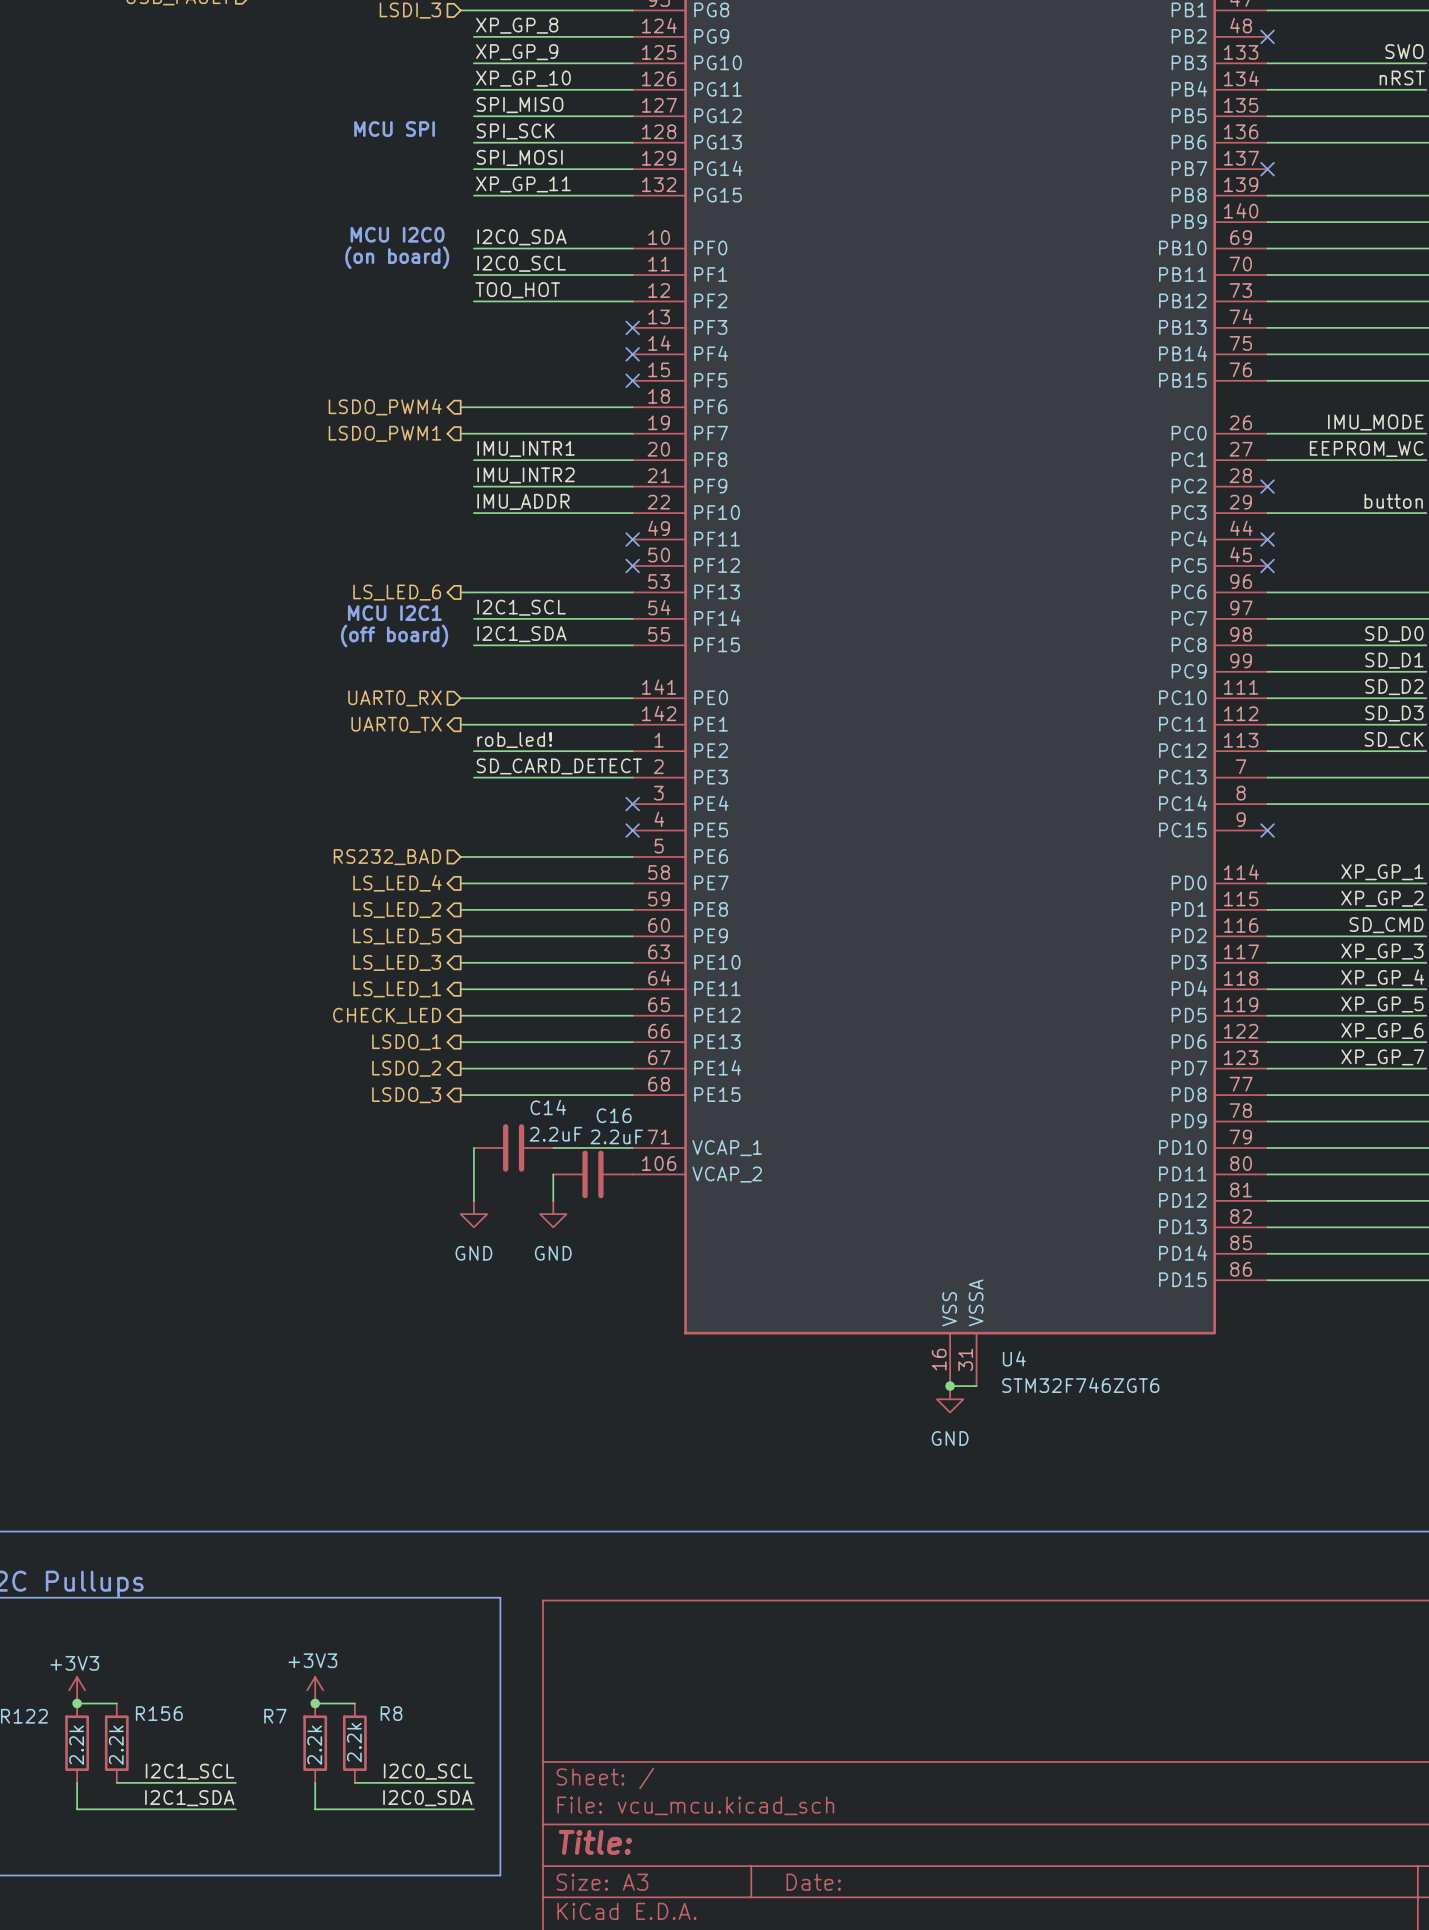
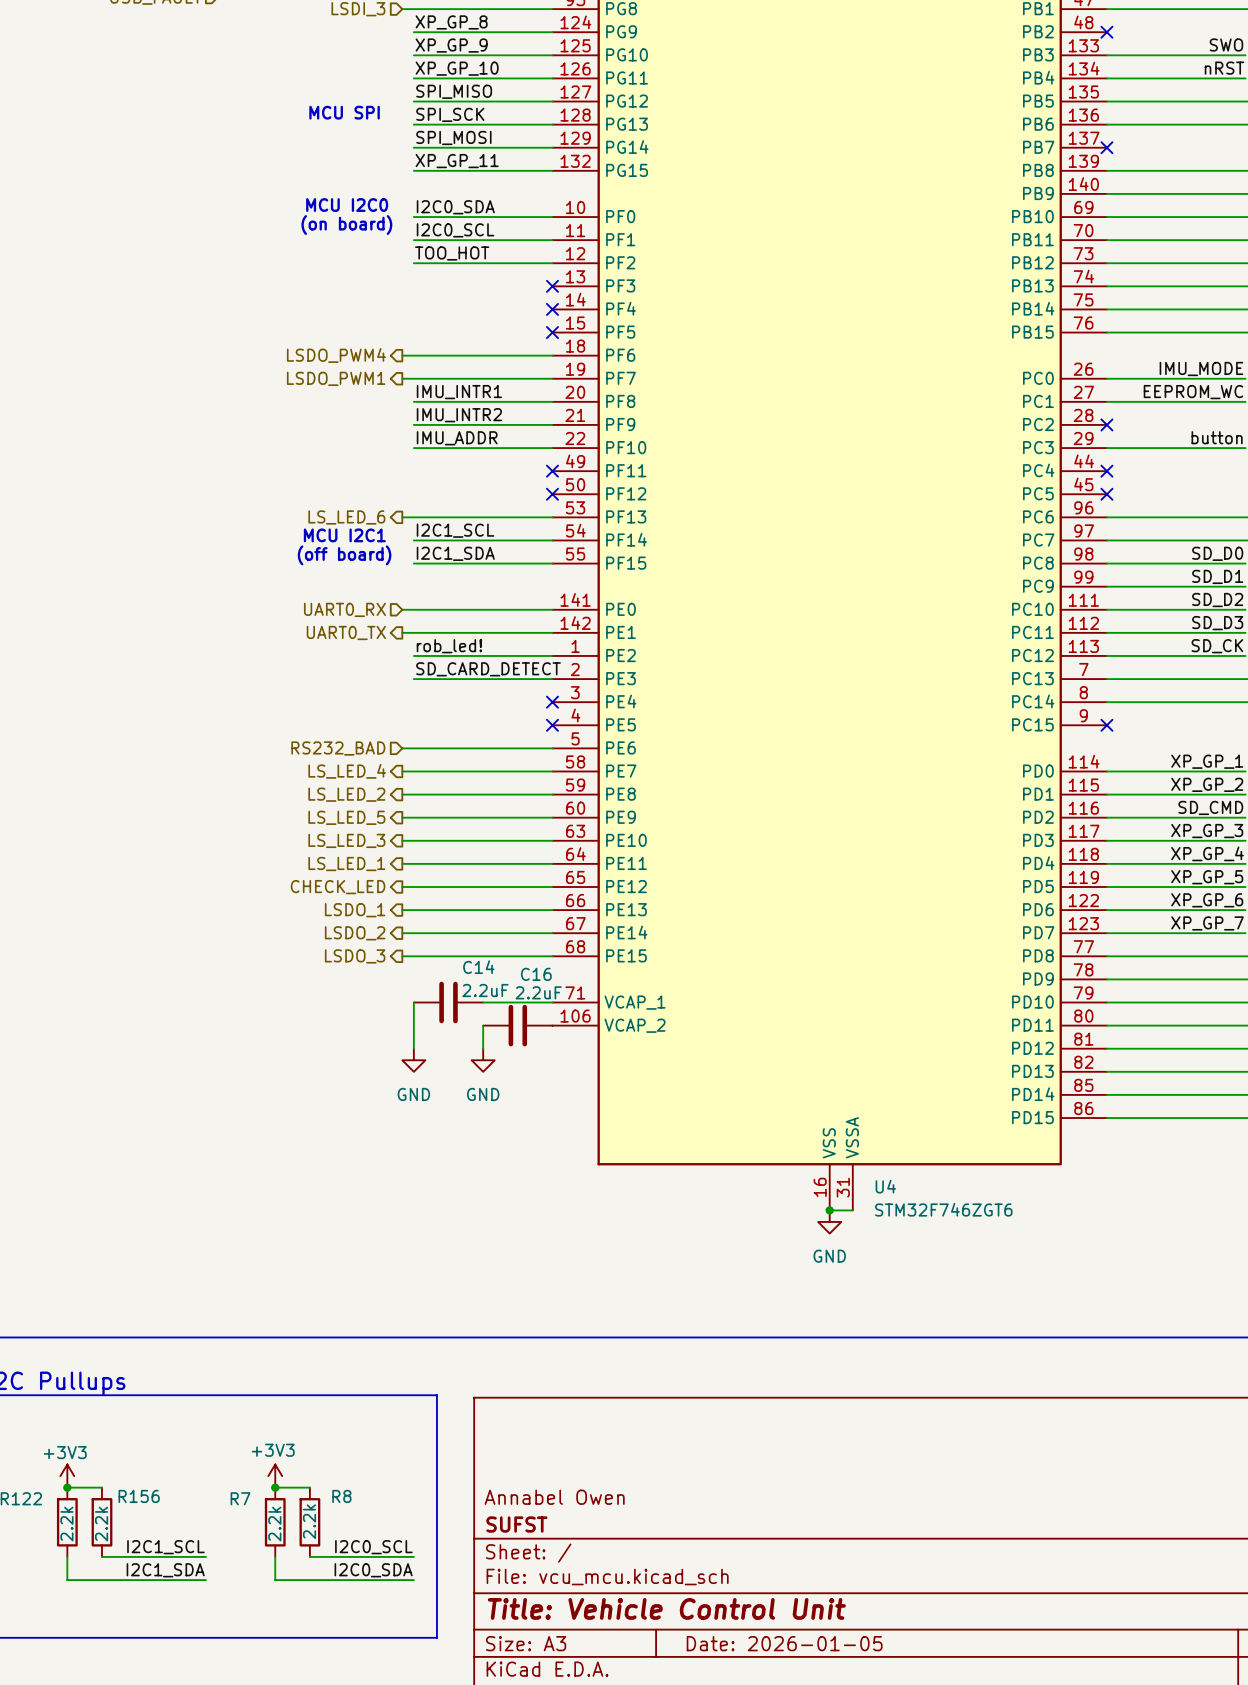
title block: none -> Annabel Owen (554, 1497)
title block: none -> SUFST (516, 1524)
title block: Title: (595, 1842) -> Title: Vehicle Control Unit (666, 1608)
title block: Date: (813, 1882) -> Date: 2026-01-05 (784, 1643)

